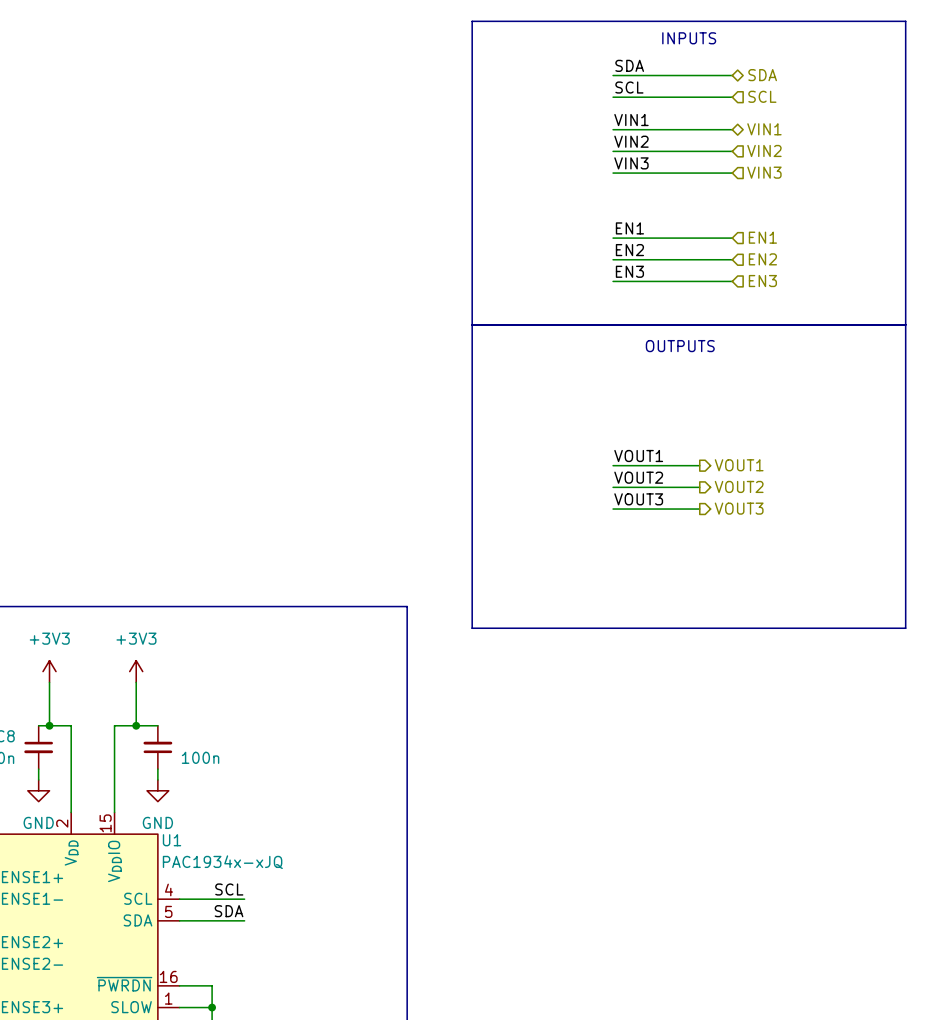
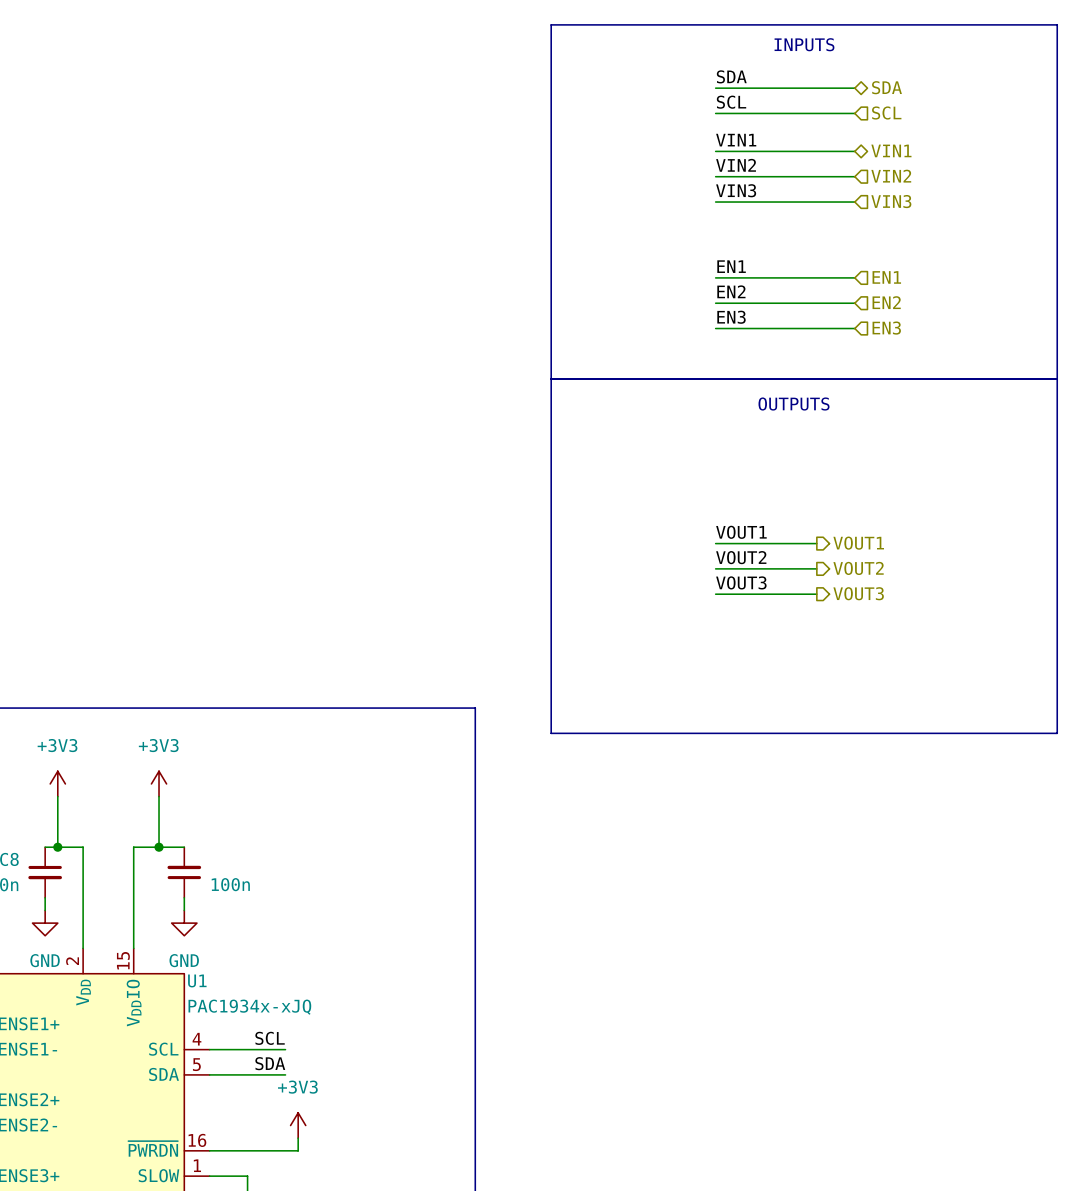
power symbol: none -> +3V3 (298, 1125)
wire: (212, 985) (212, 1007) -> (247, 1150) (298, 1150) (298, 1138)
junction: (212, 1007) -> none

